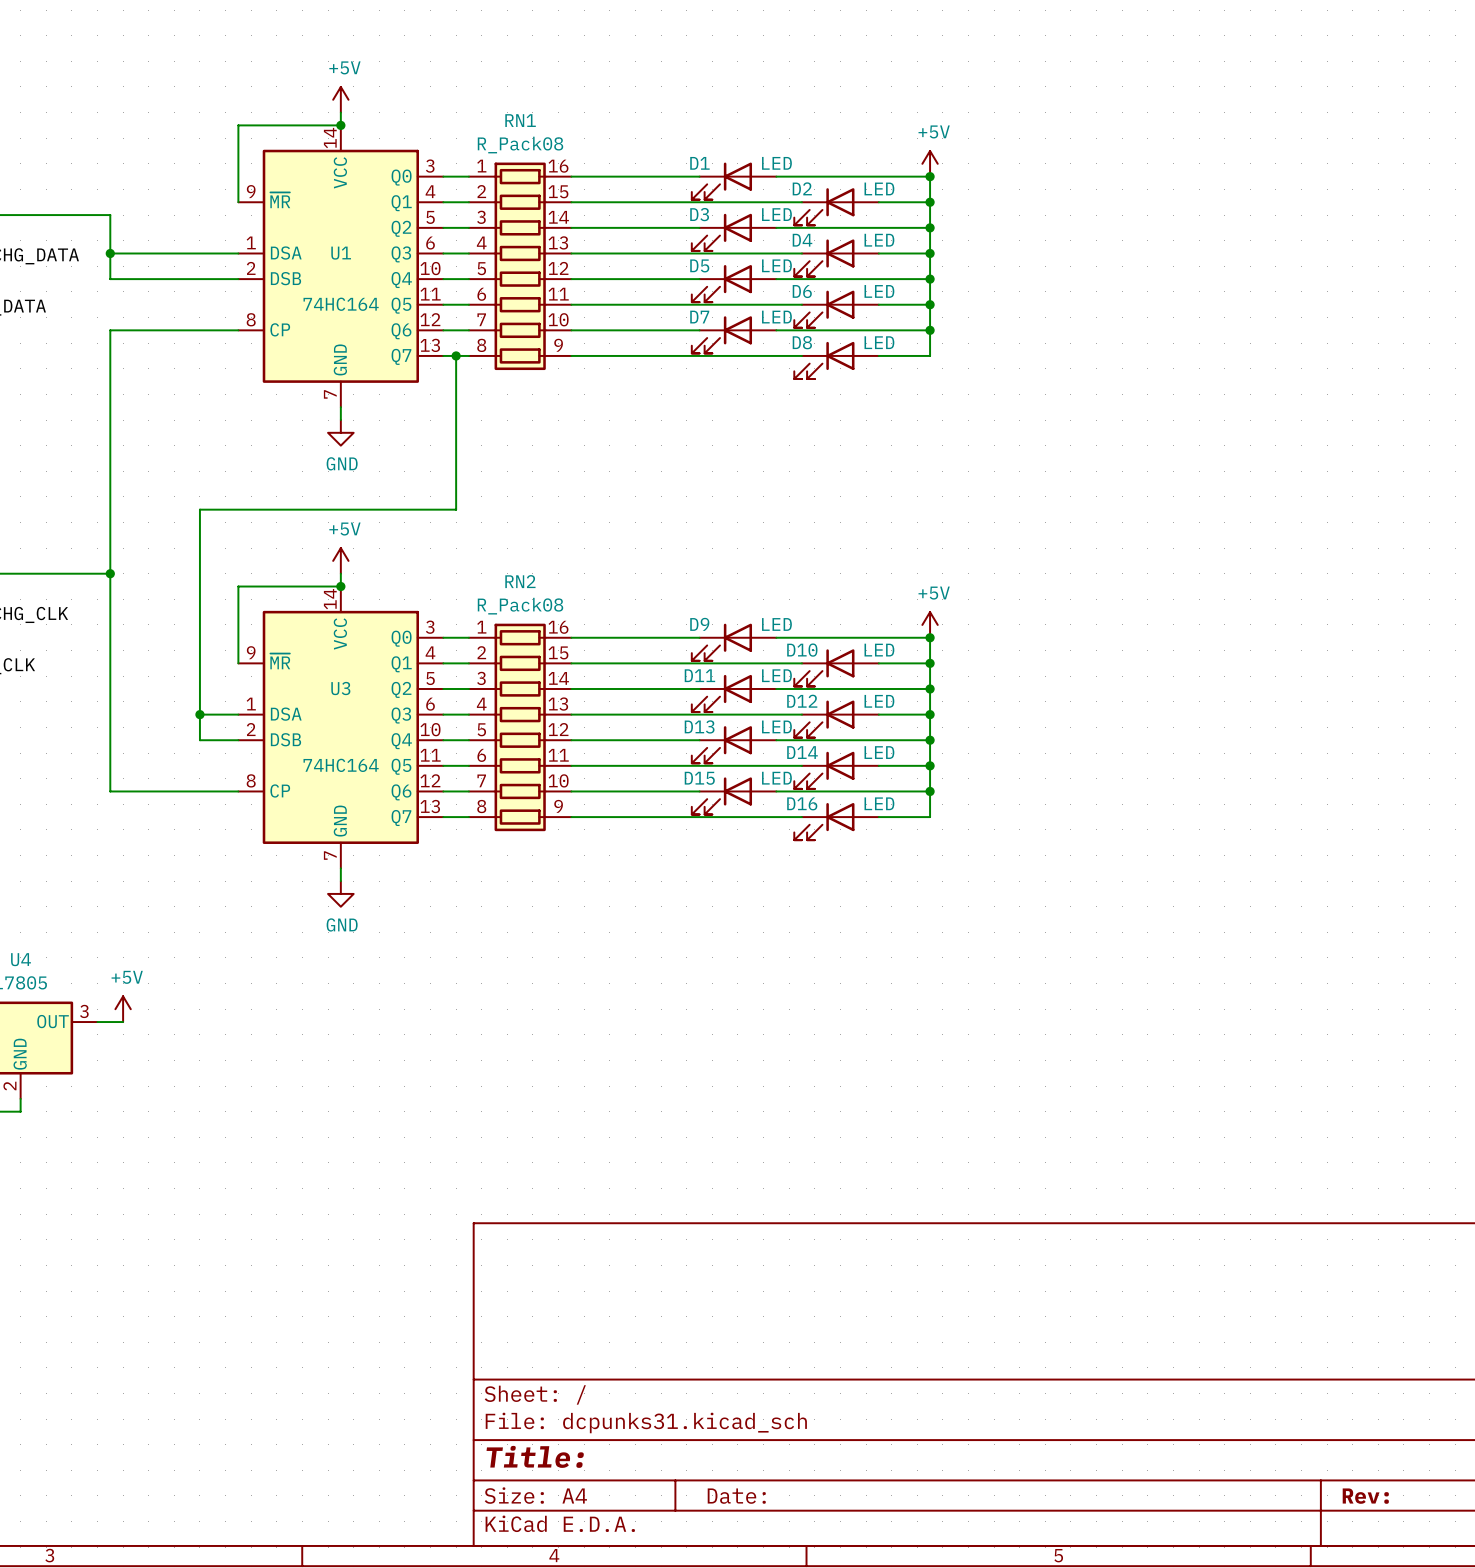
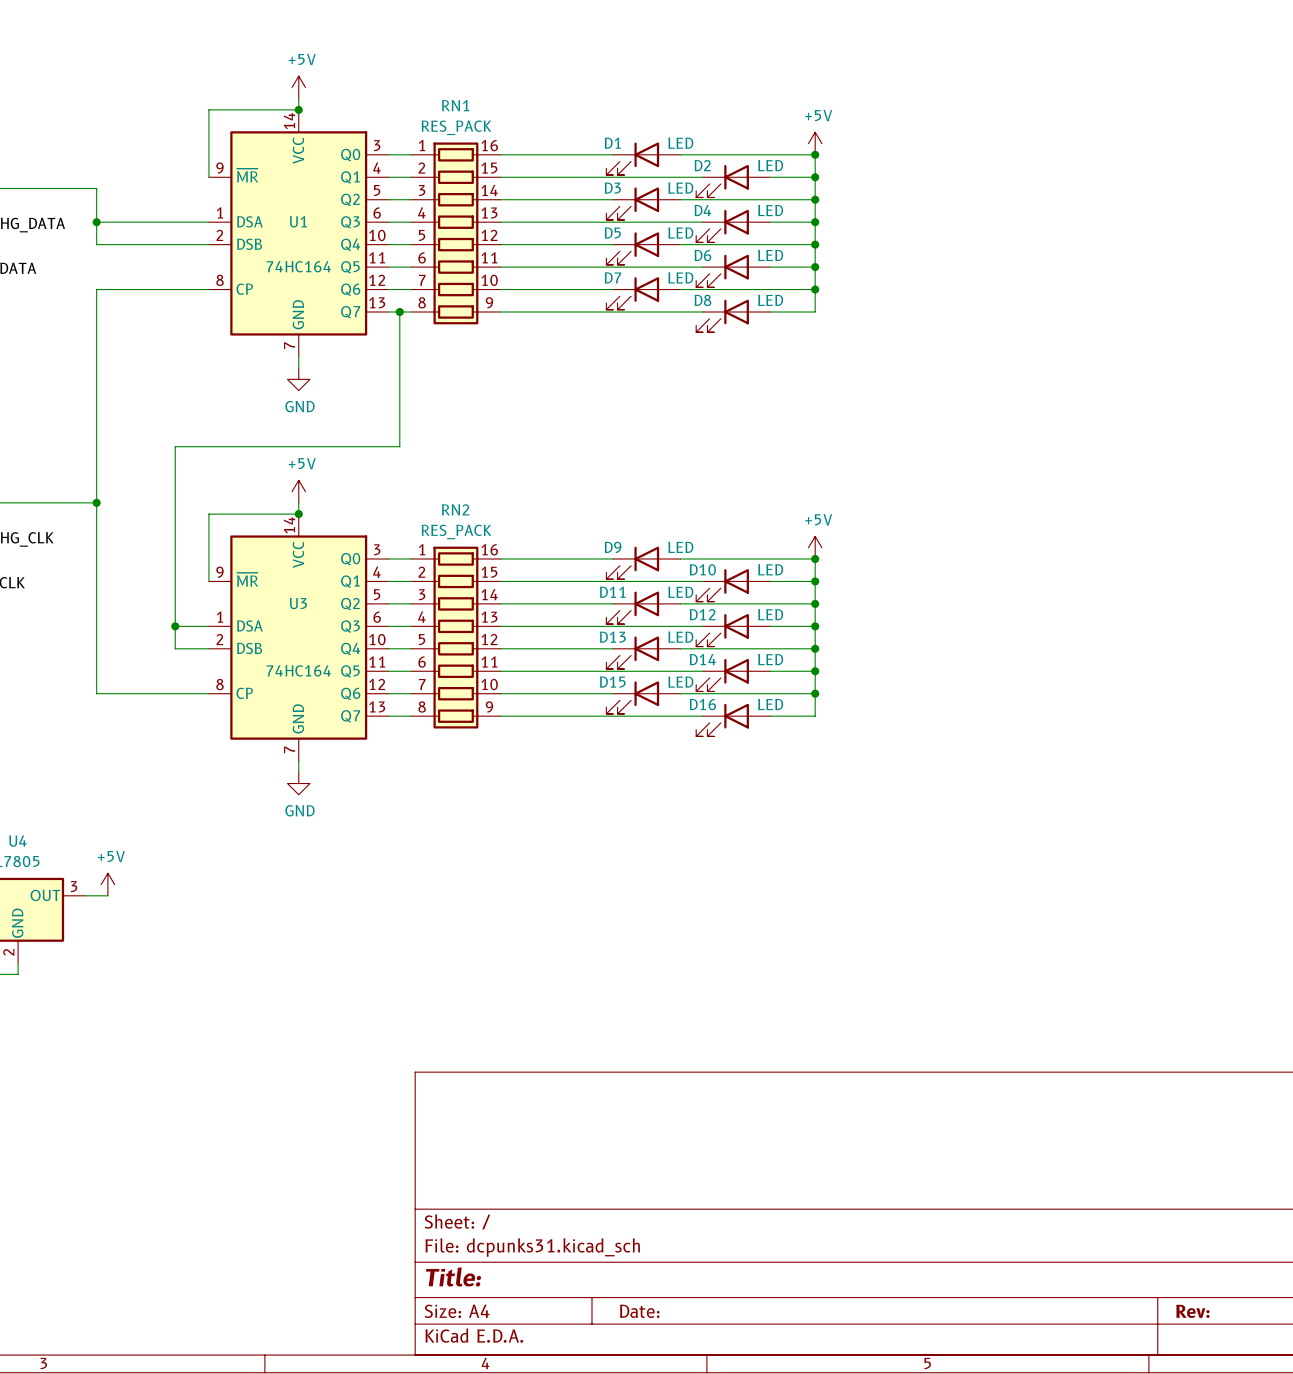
RN1 value: R_Pack08 (520, 145) -> RES_PACK (456, 127)
RN2 value: R_Pack08 (520, 606) -> RES_PACK (456, 531)

